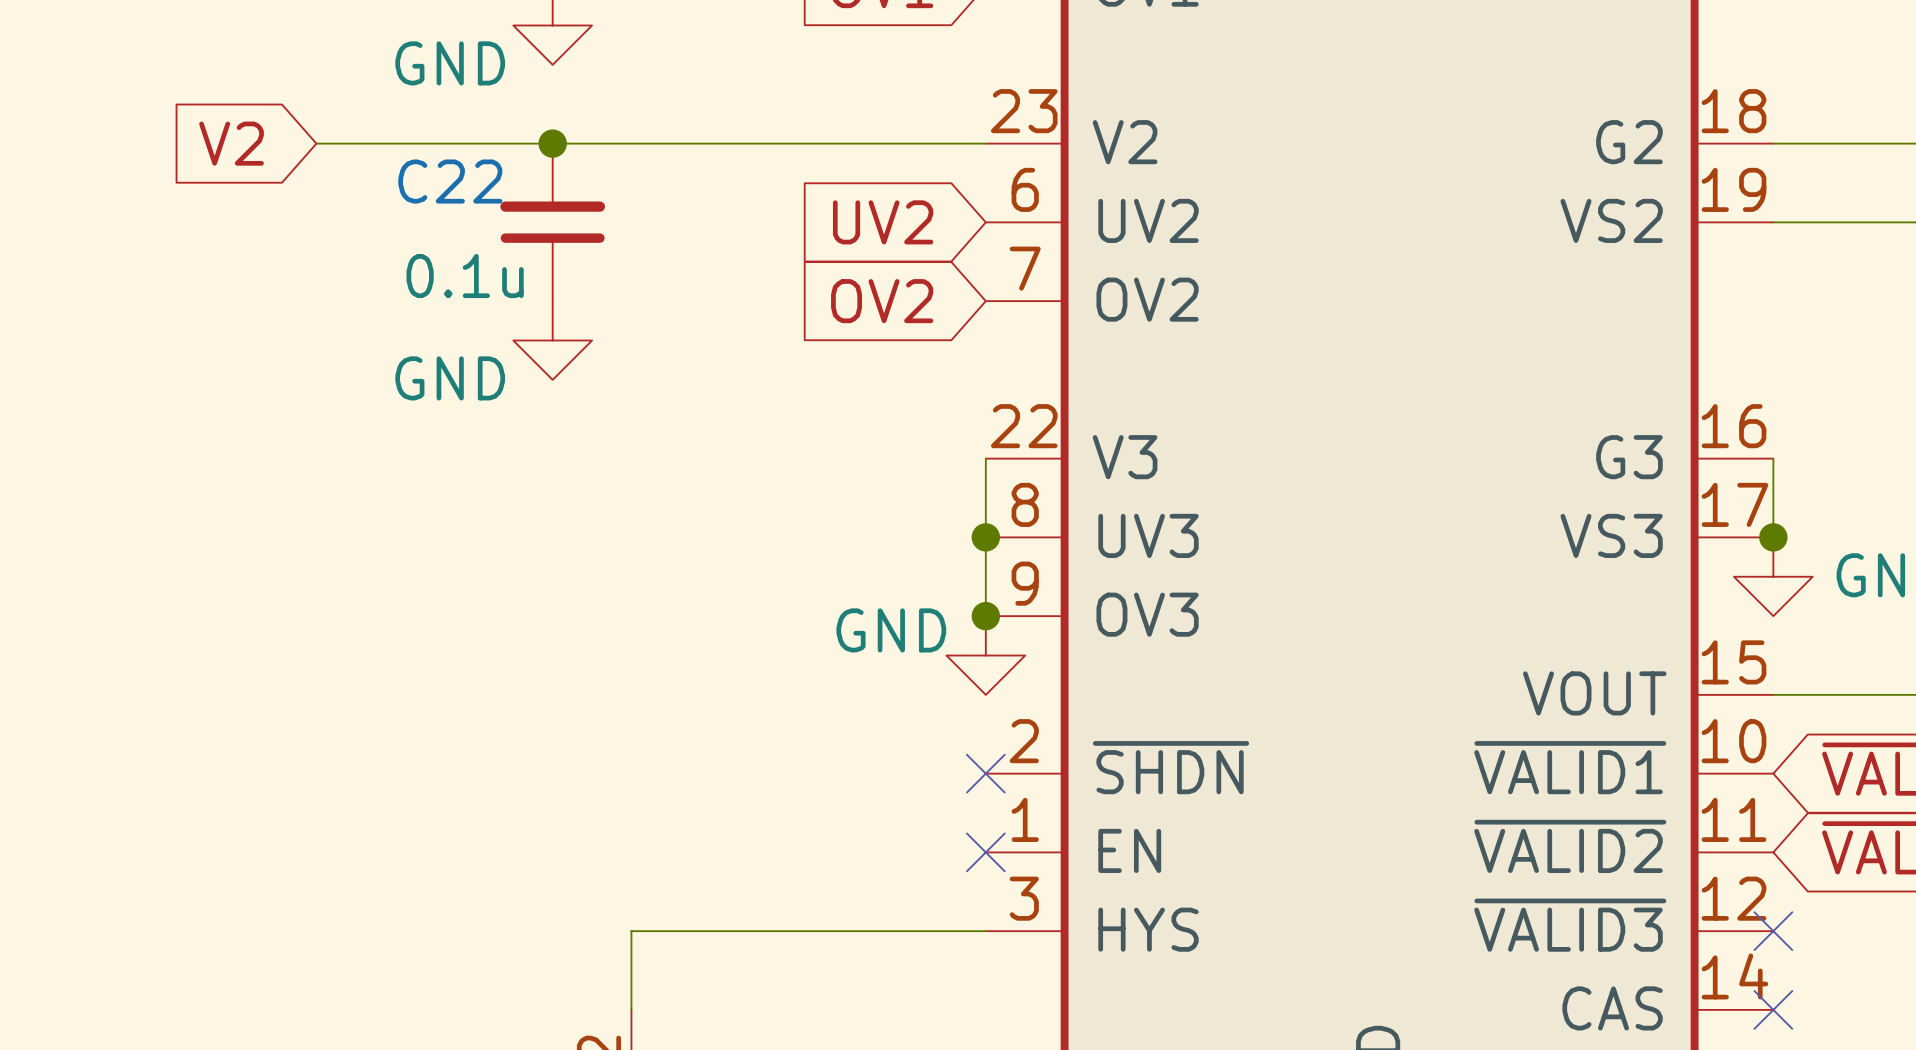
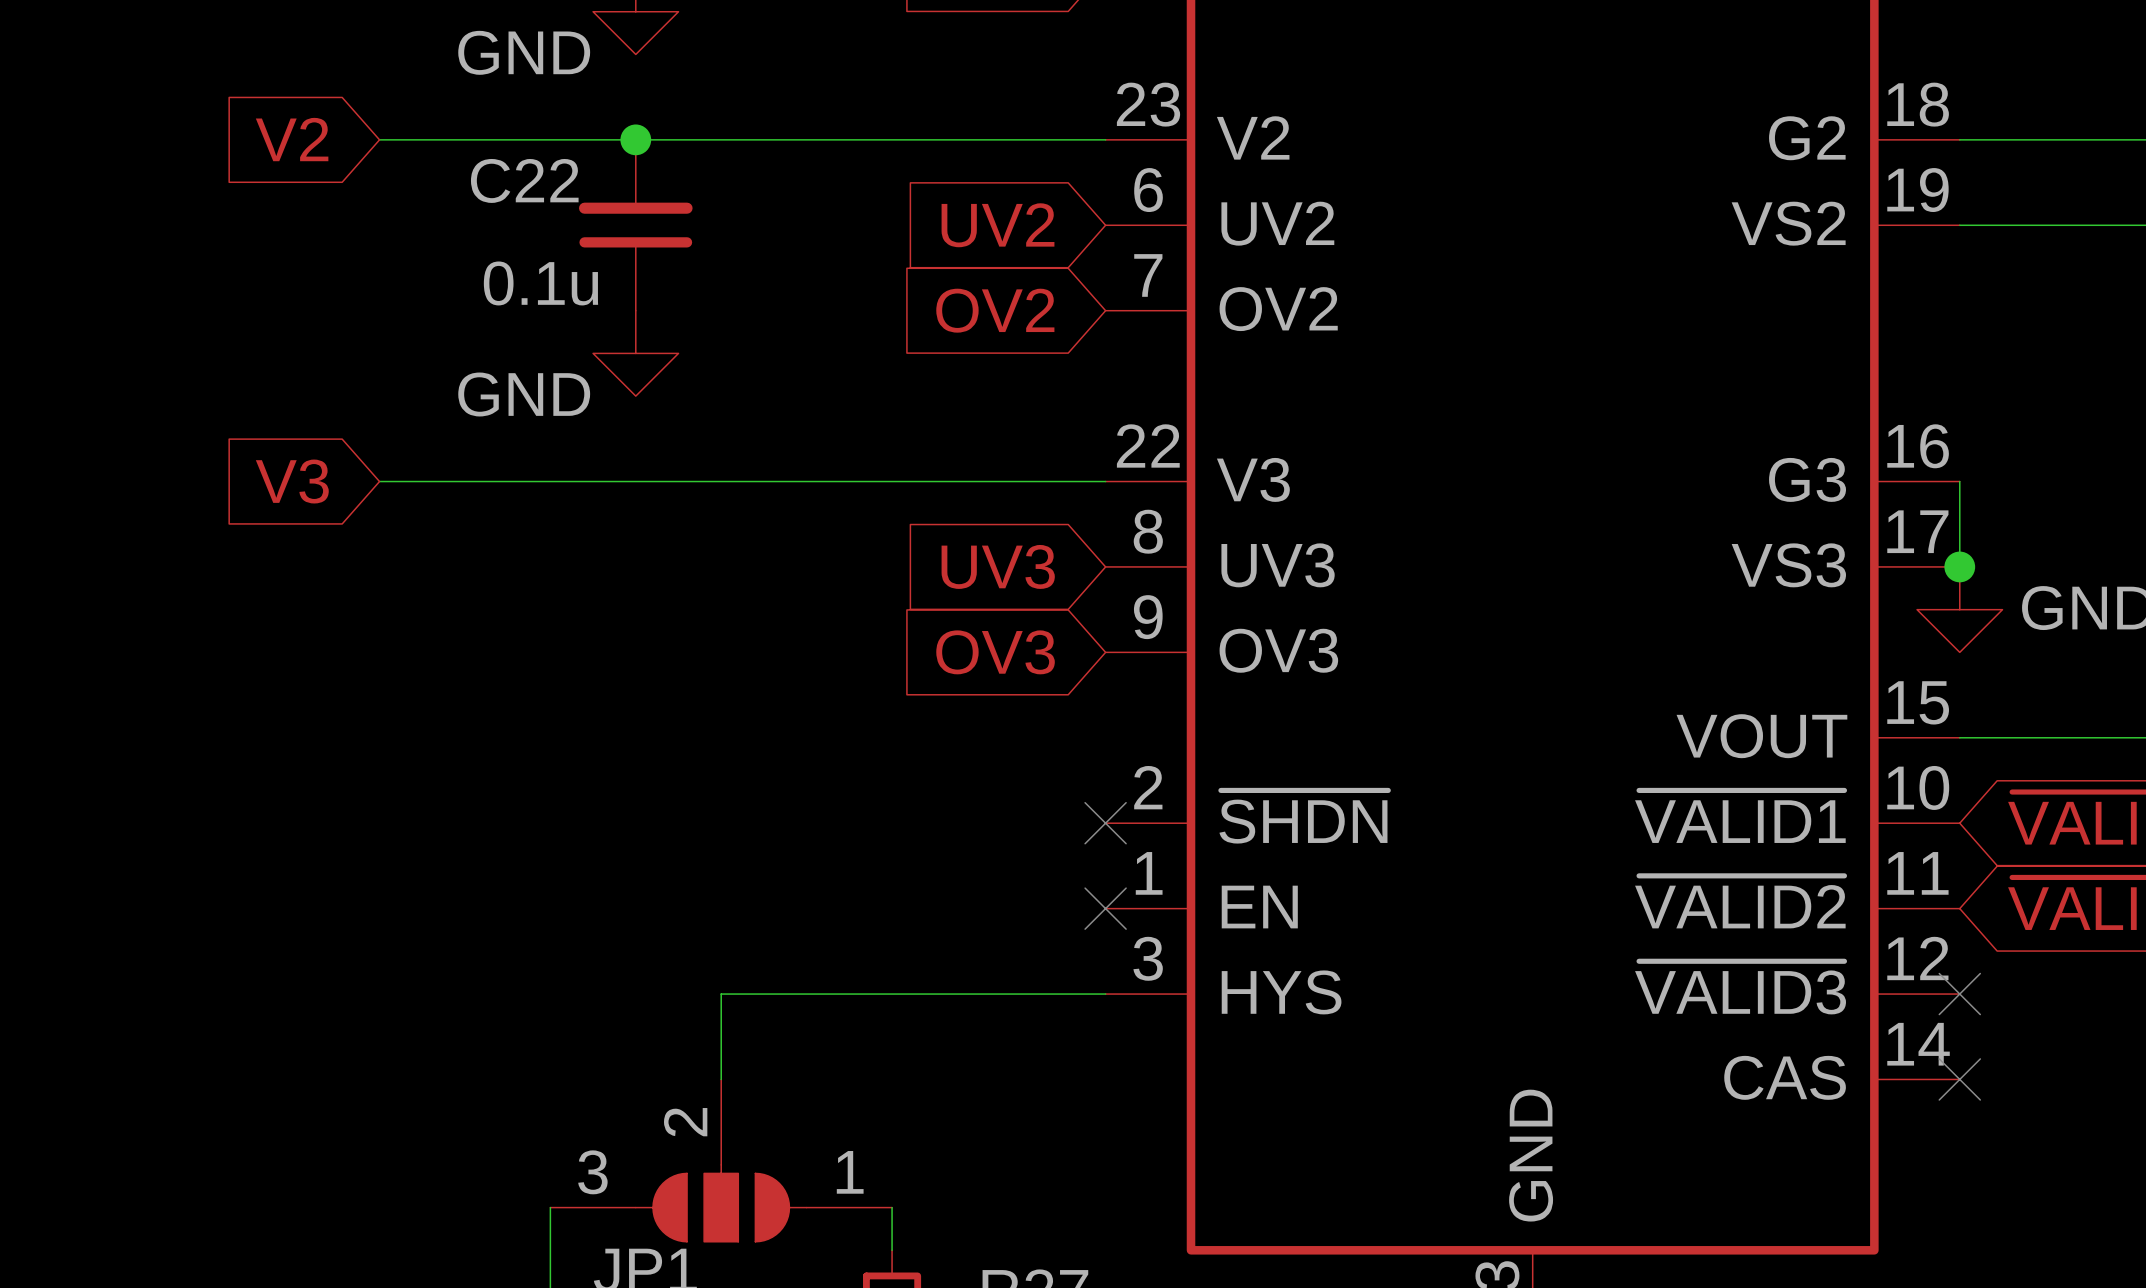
global label: none -> V3 (292, 481)
wire: (985, 458) (985, 616) -> (1105, 481) (379, 481)
global label: none -> UV3 (998, 566)
junction: (985, 537) -> none
global label: none -> OV3 (995, 652)
junction: (985, 616) -> none
power symbol: GND (985, 655) -> none

